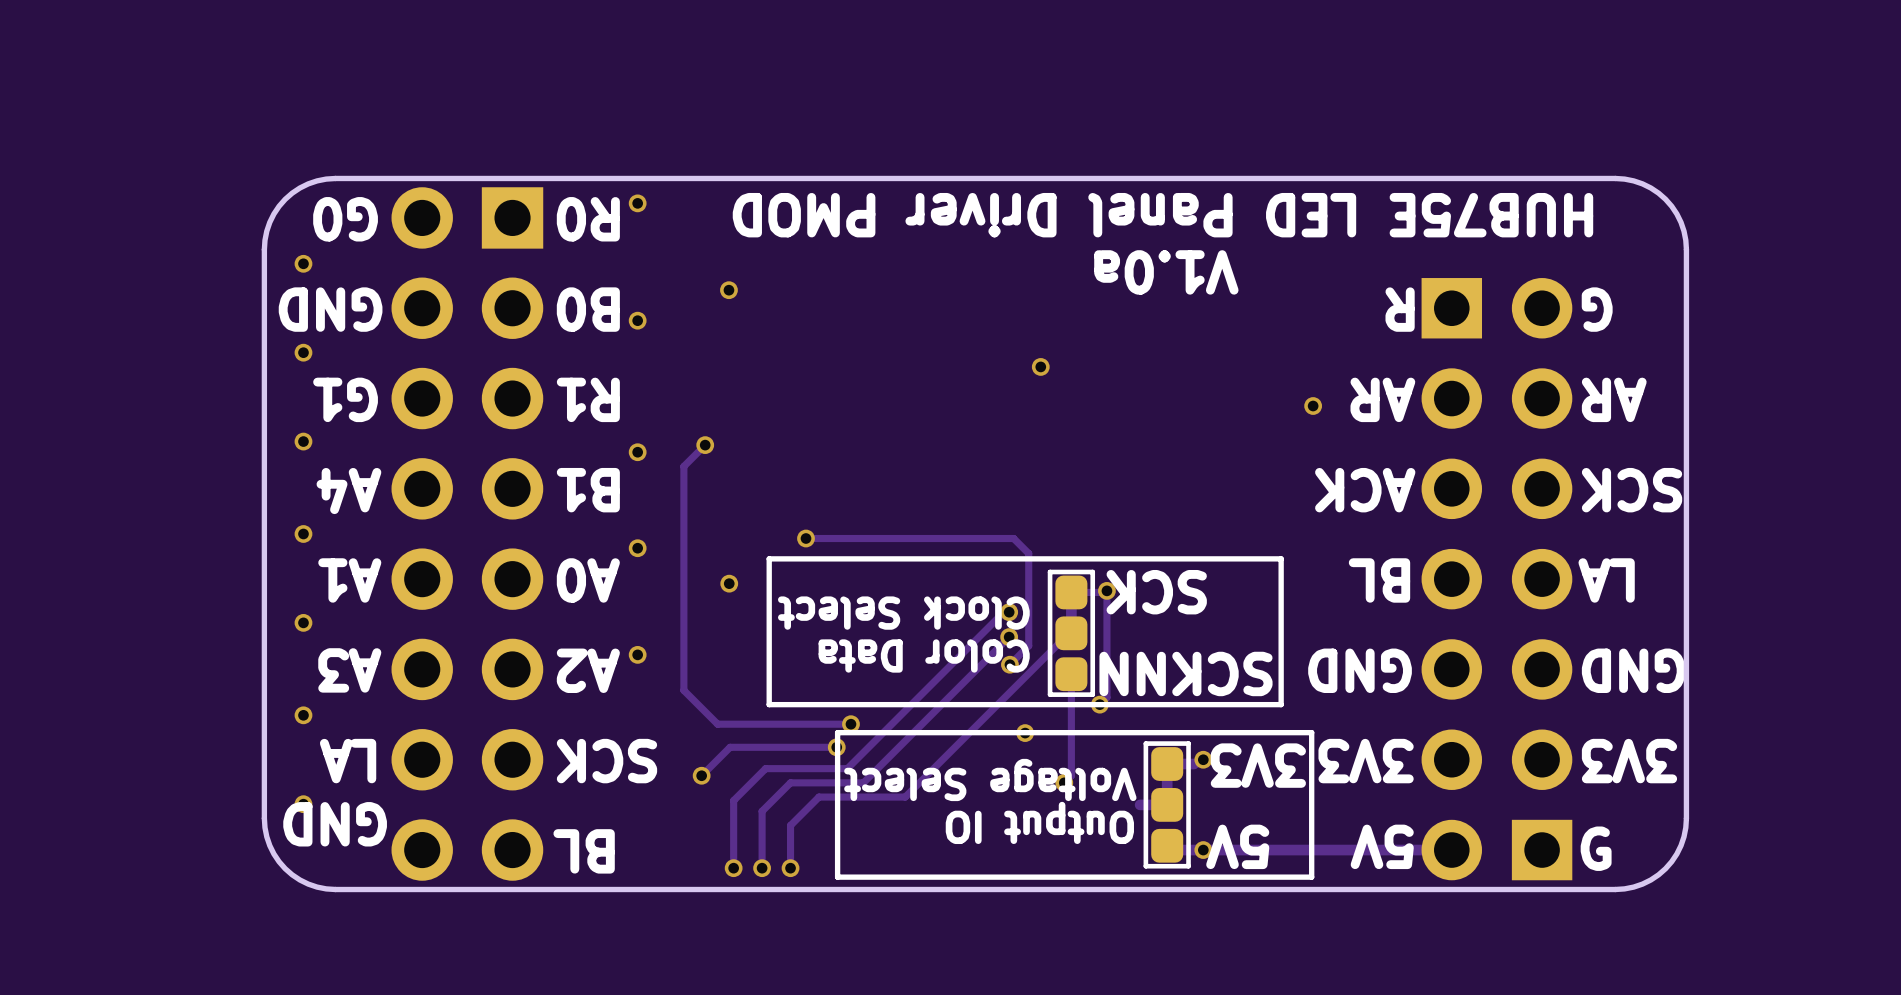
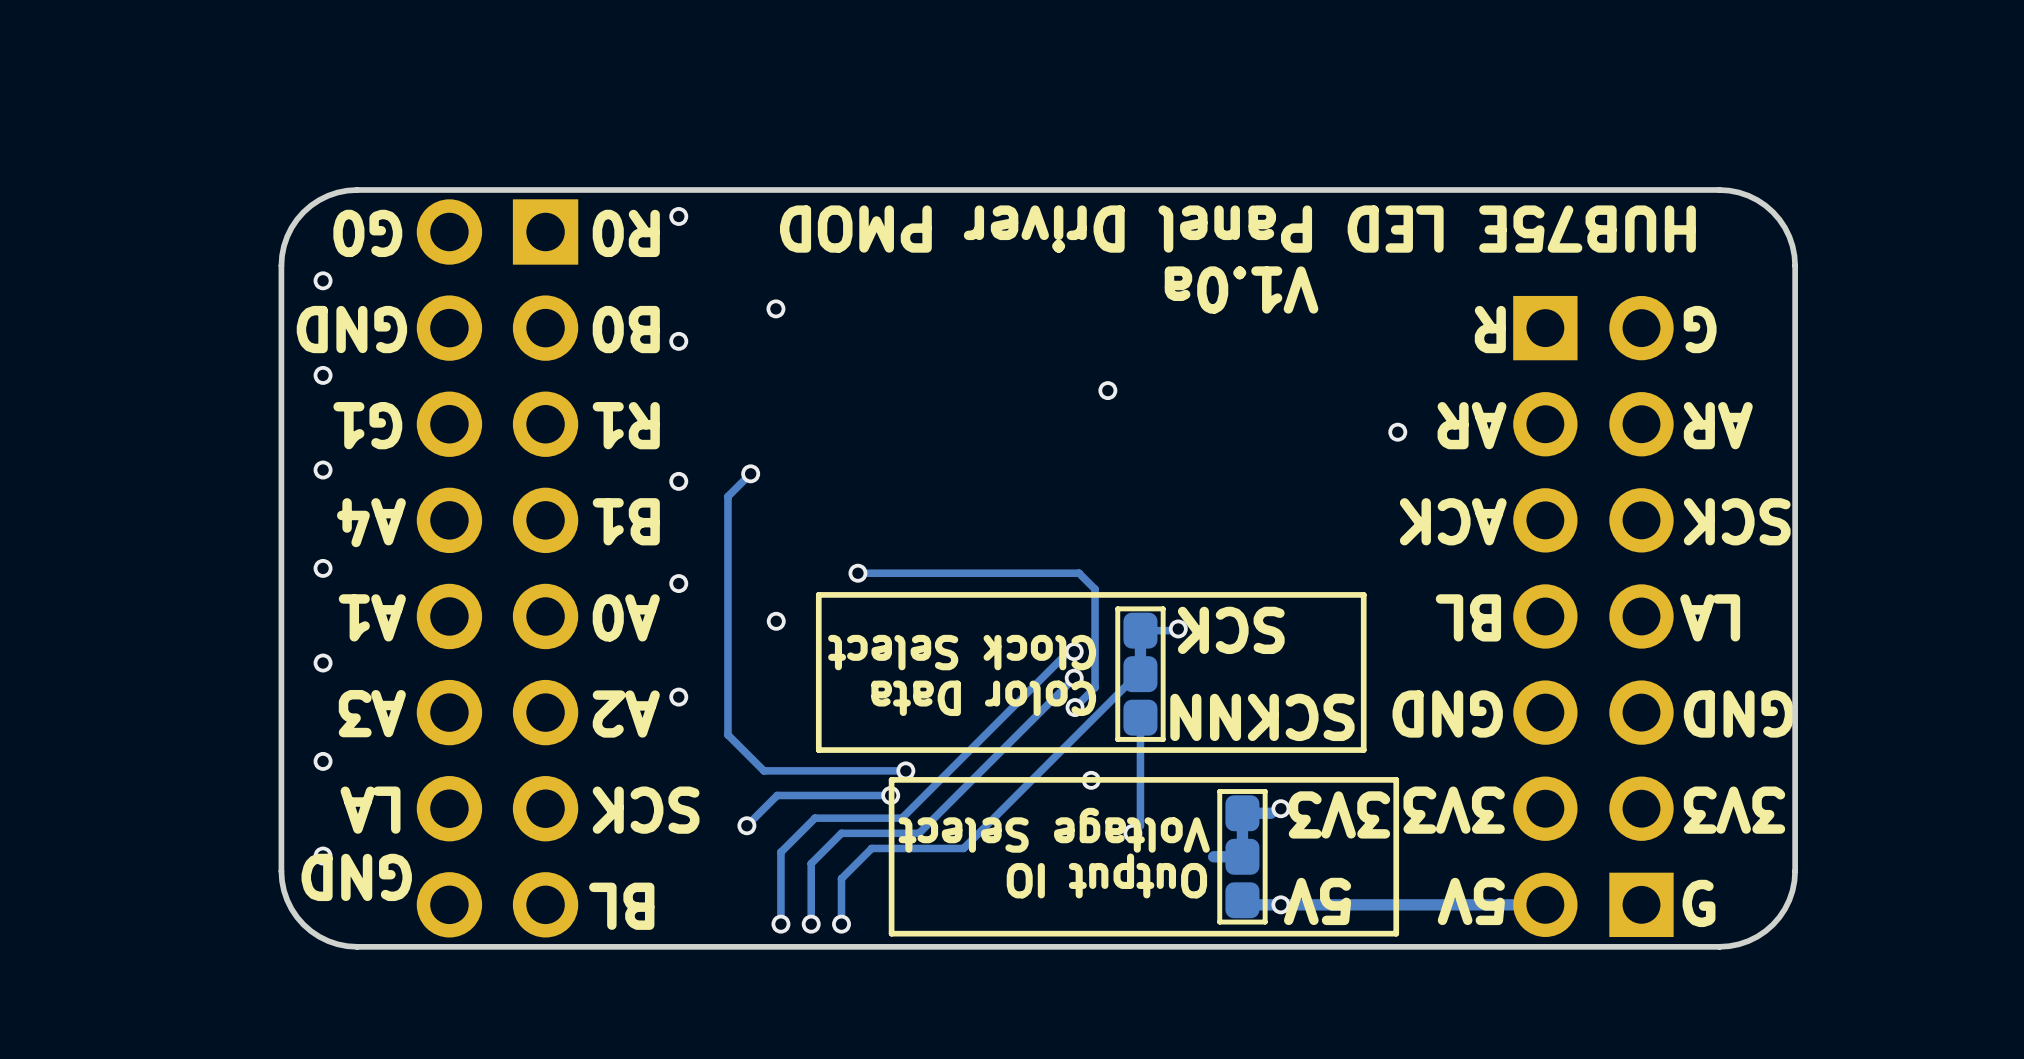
track: (1106, 590) (1106, 697) (1099, 704) -> none
via: (1099, 704) -> none

